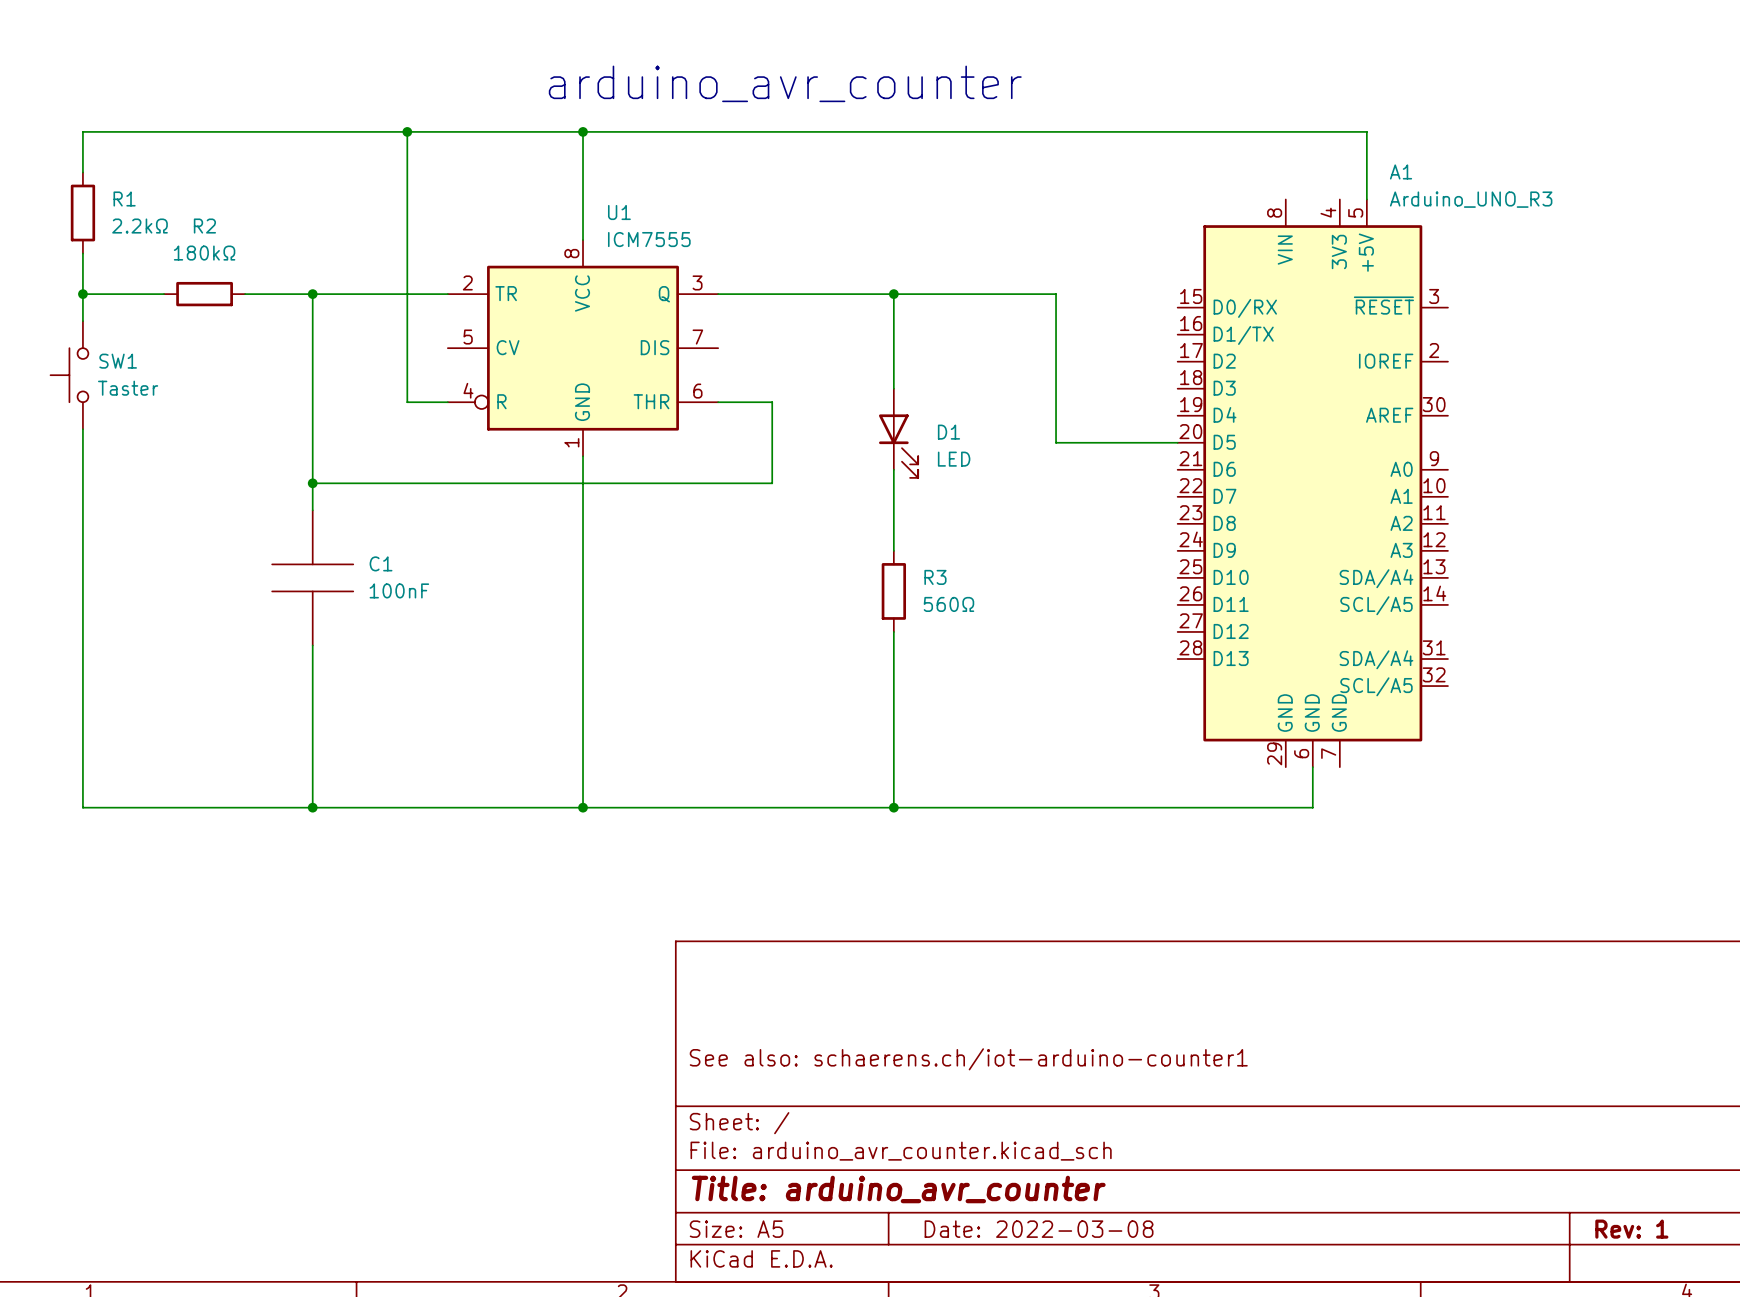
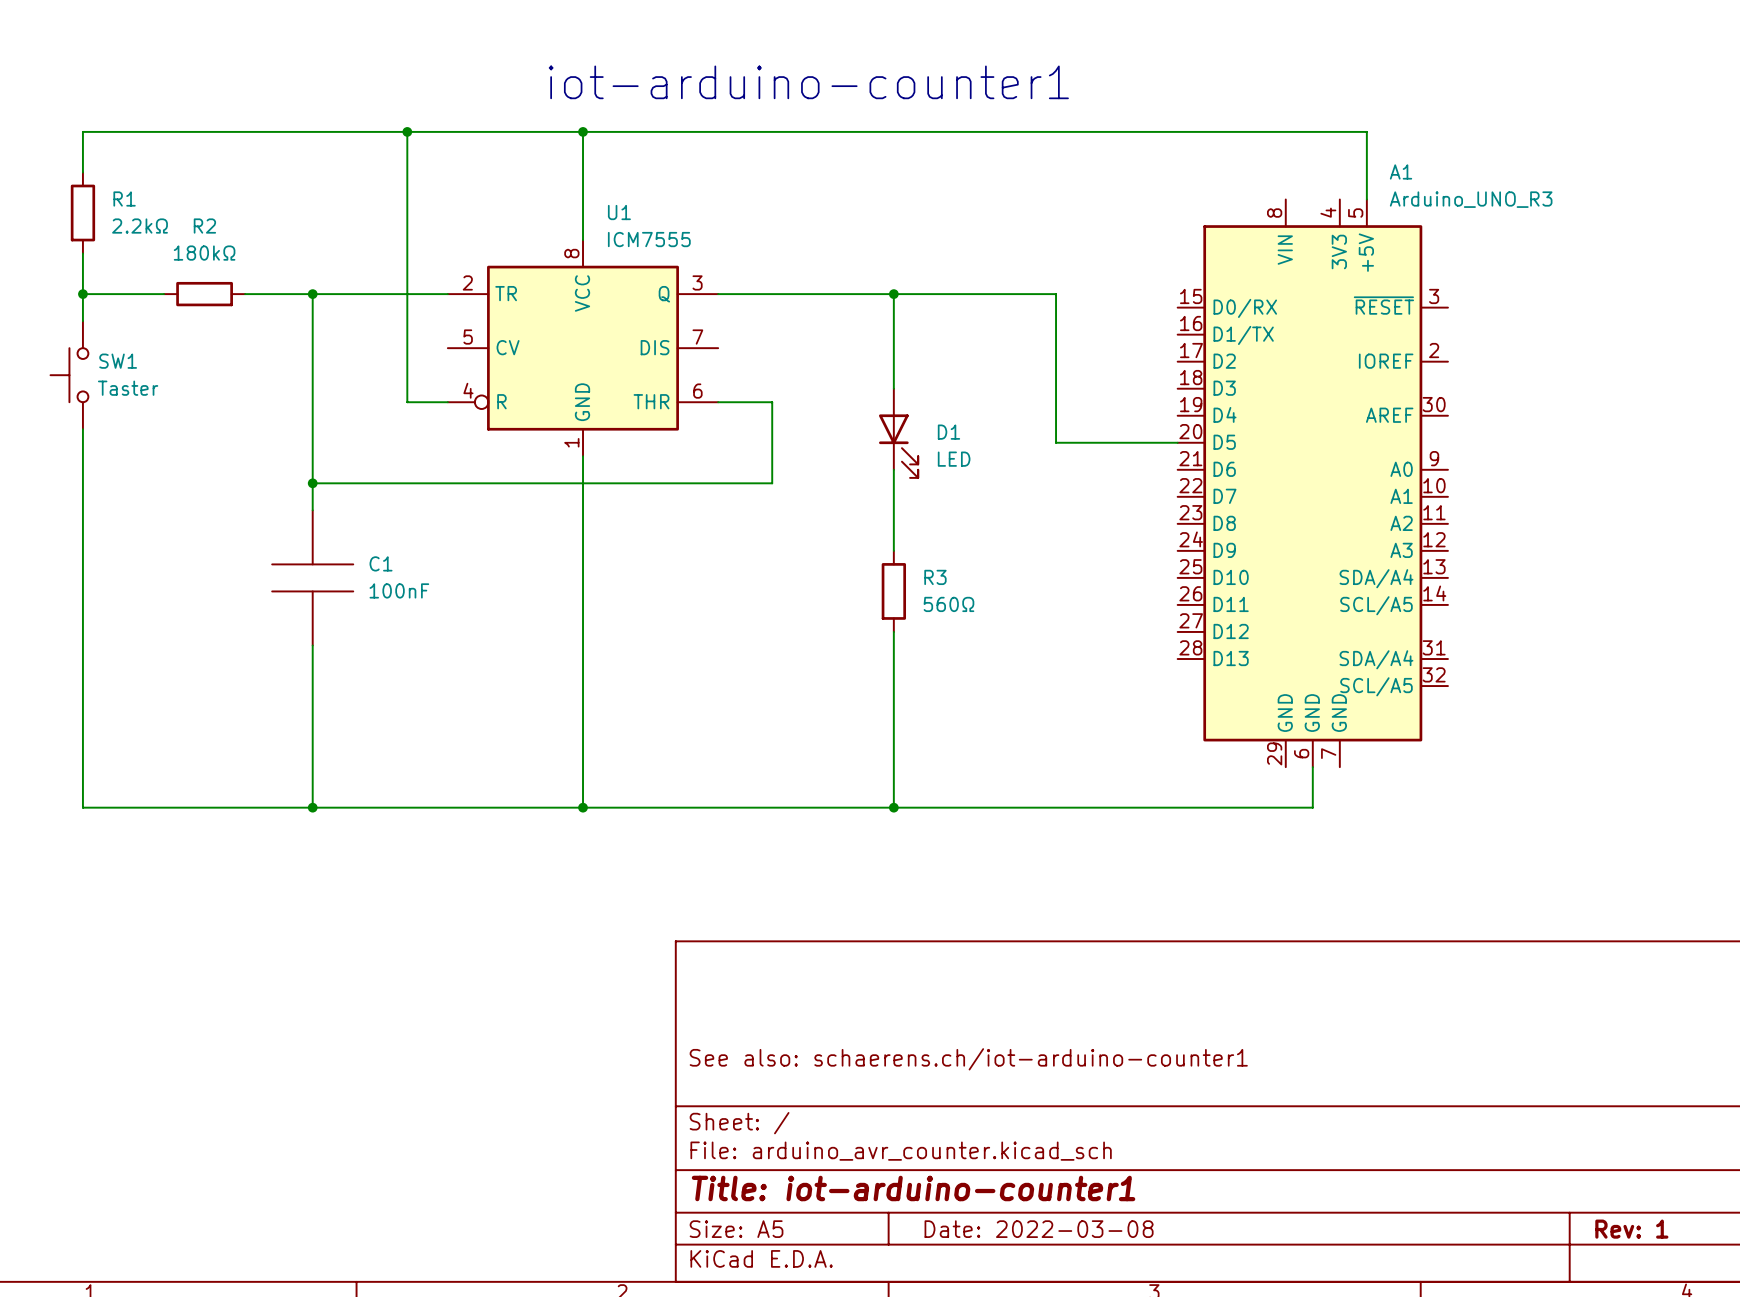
text: arduino_avr_counter (785, 83) -> iot-arduino-counter1 (808, 82)
title block: Title: arduino_avr_counter (898, 1189) -> Title: iot-arduino-counter1 (913, 1188)

